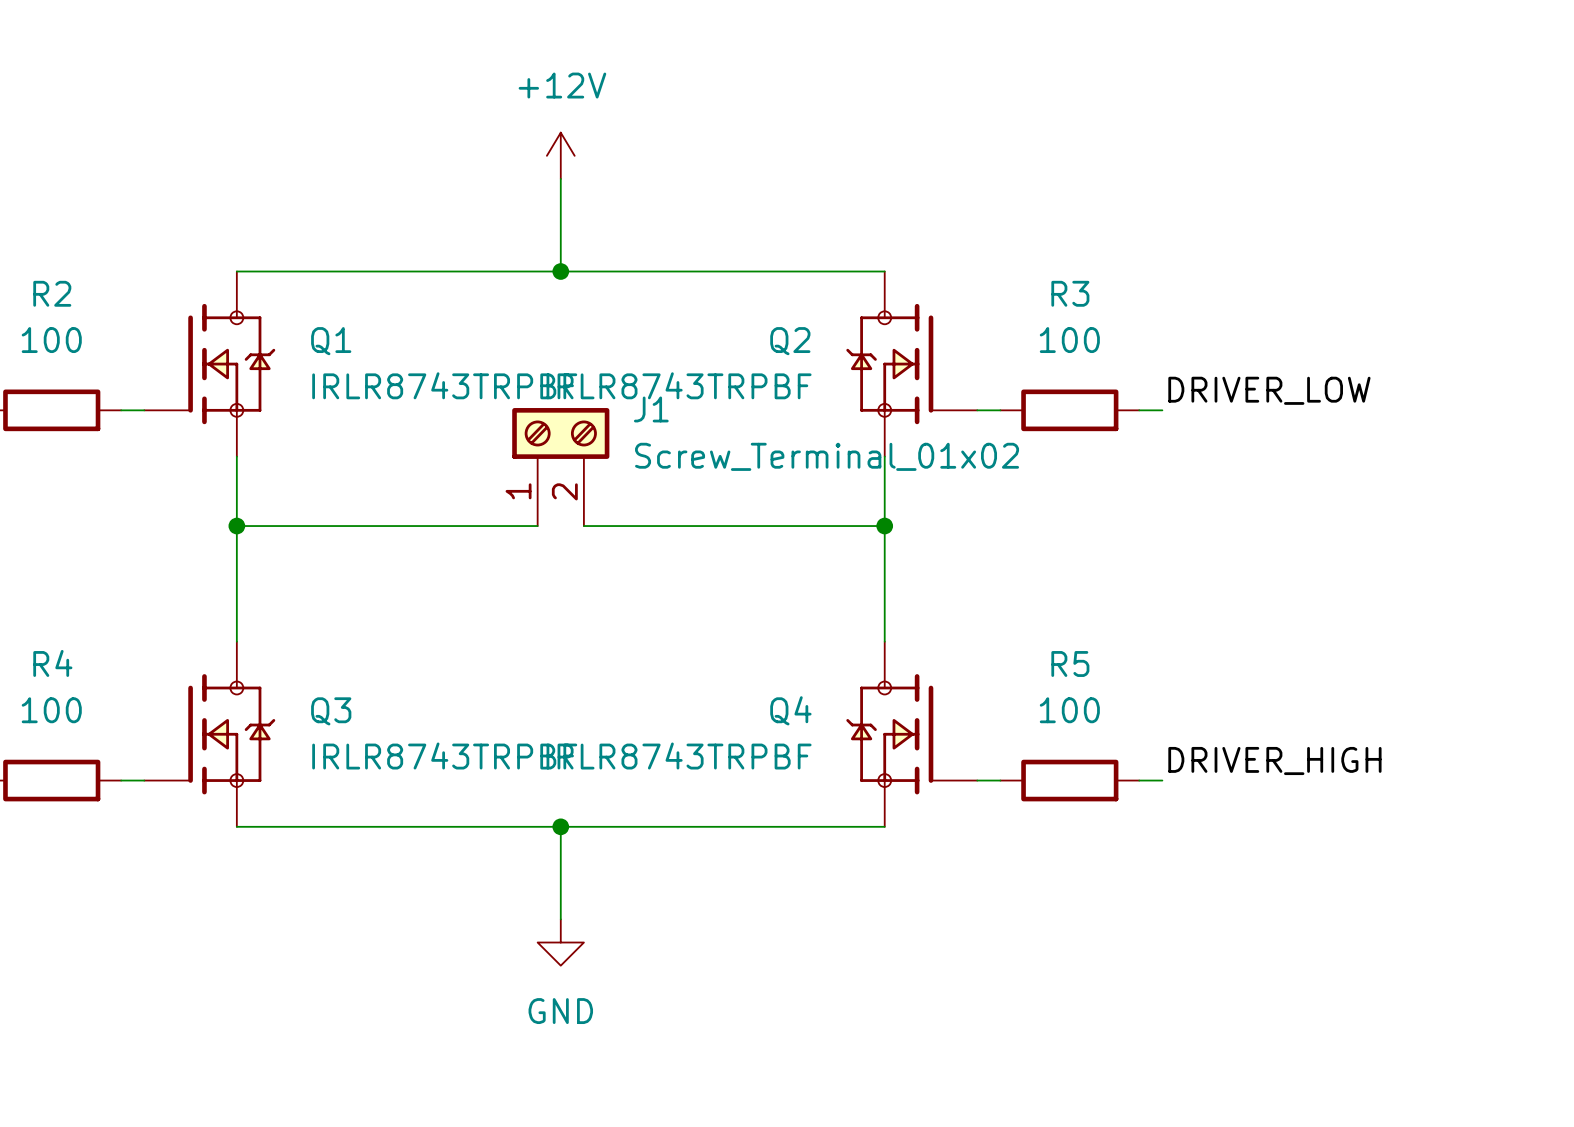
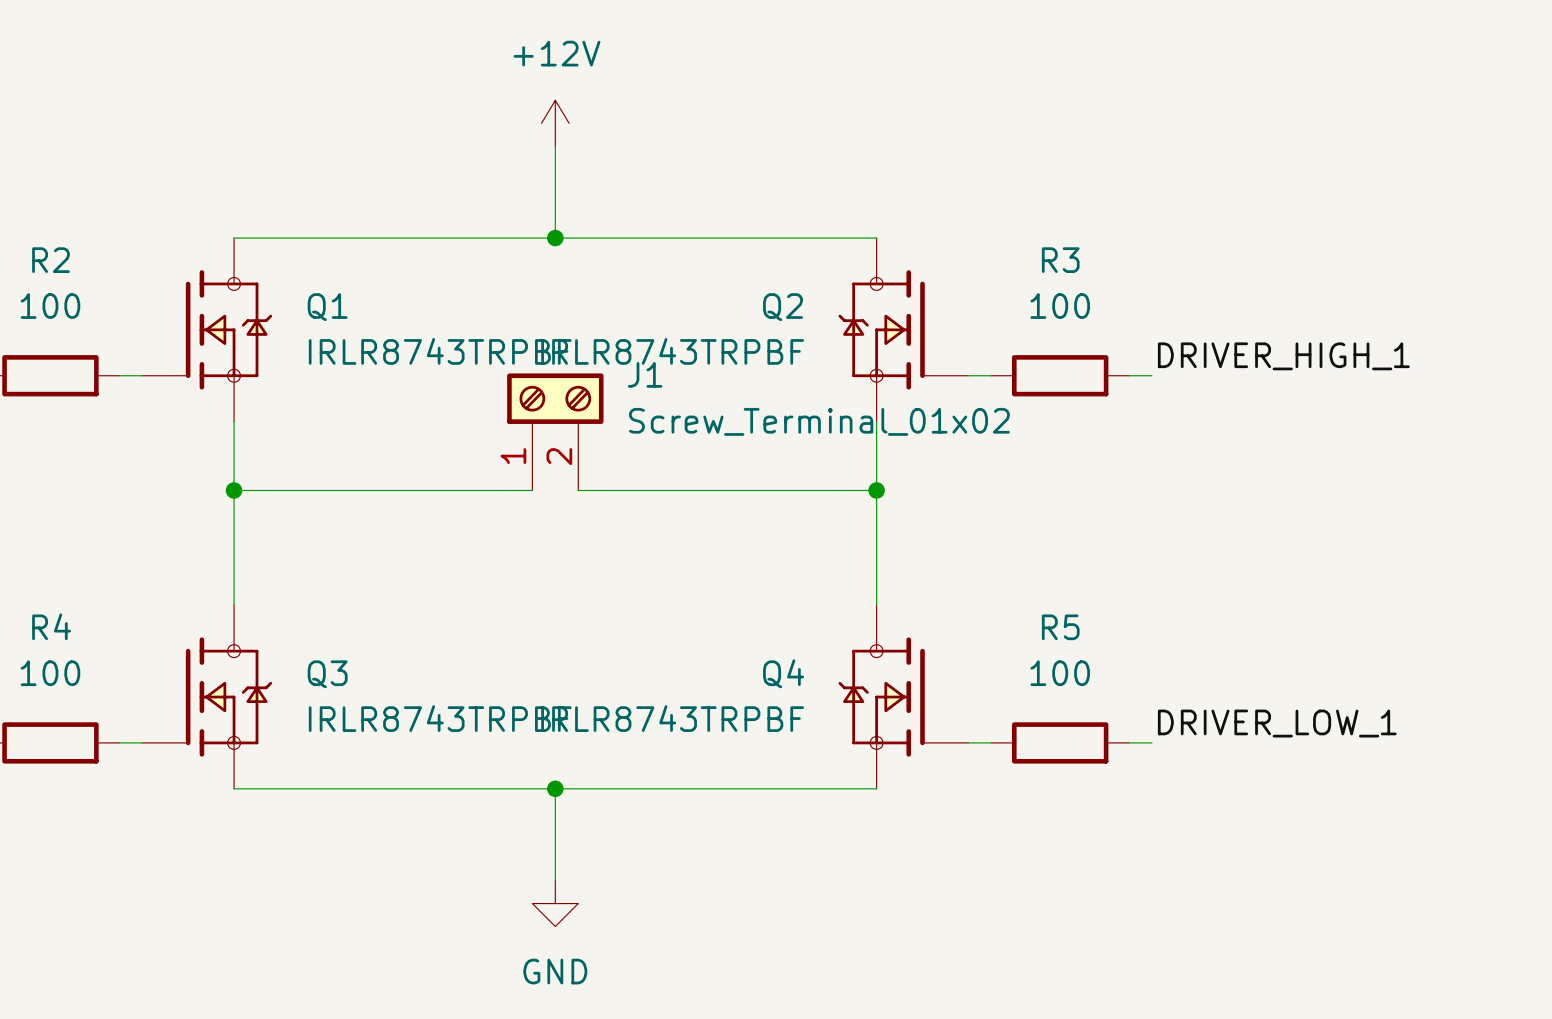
label: DRIVER_LOW (1269, 390) -> DRIVER_HIGH_1 (1283, 356)
label: DRIVER_HIGH (1274, 761) -> DRIVER_LOW_1 (1277, 723)

